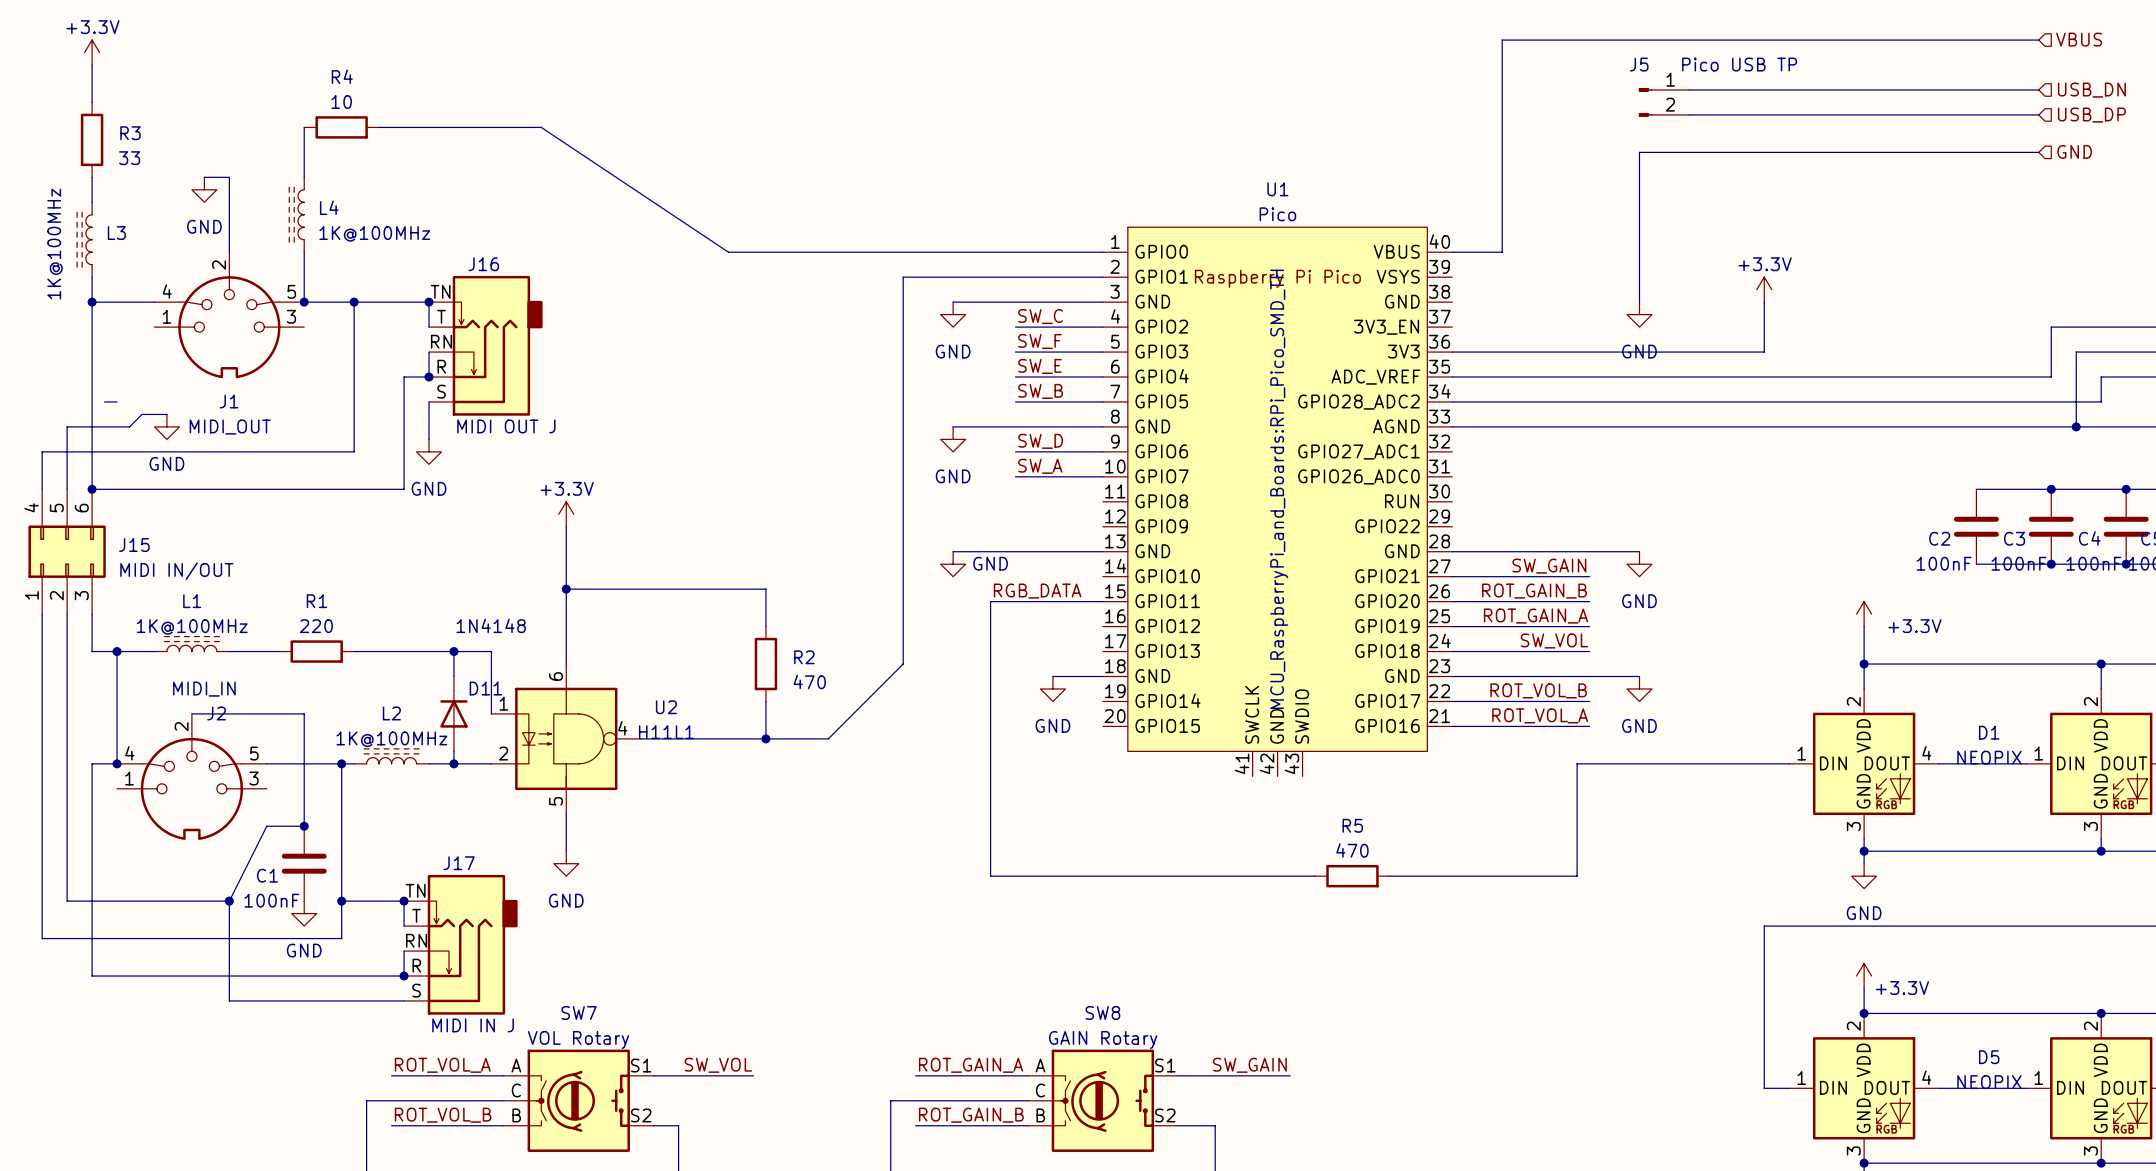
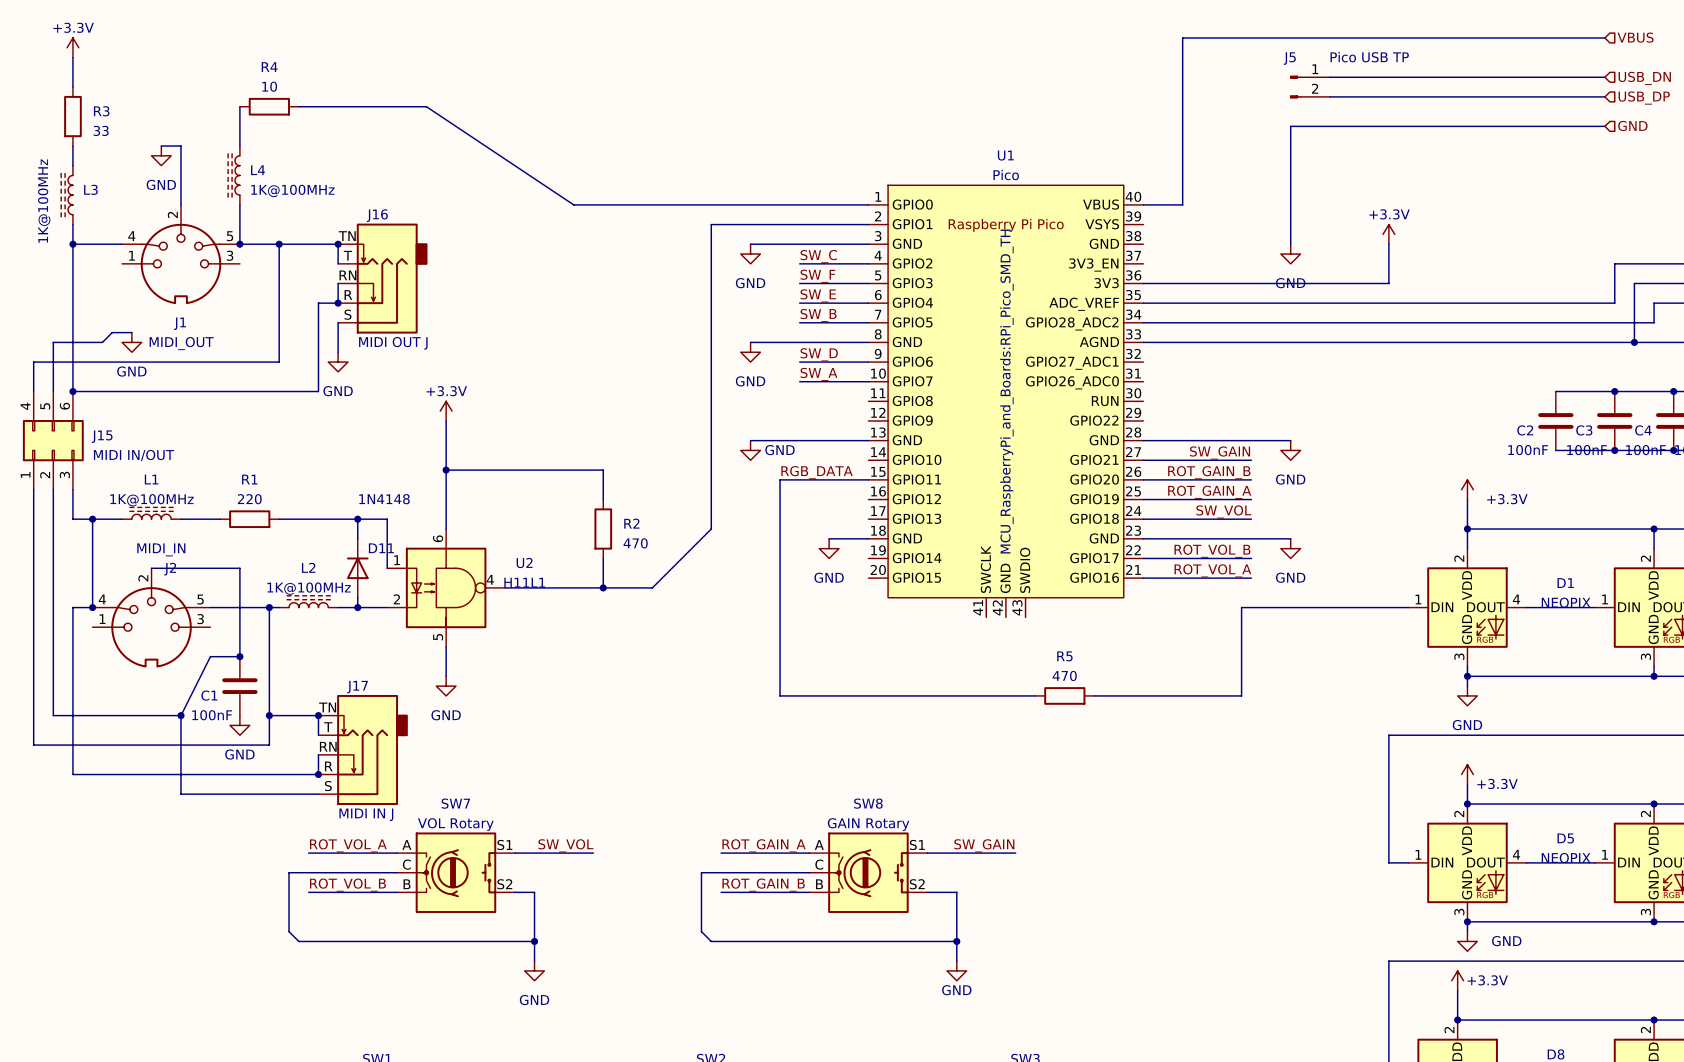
wire: (104, 401) (117, 401) -> none

